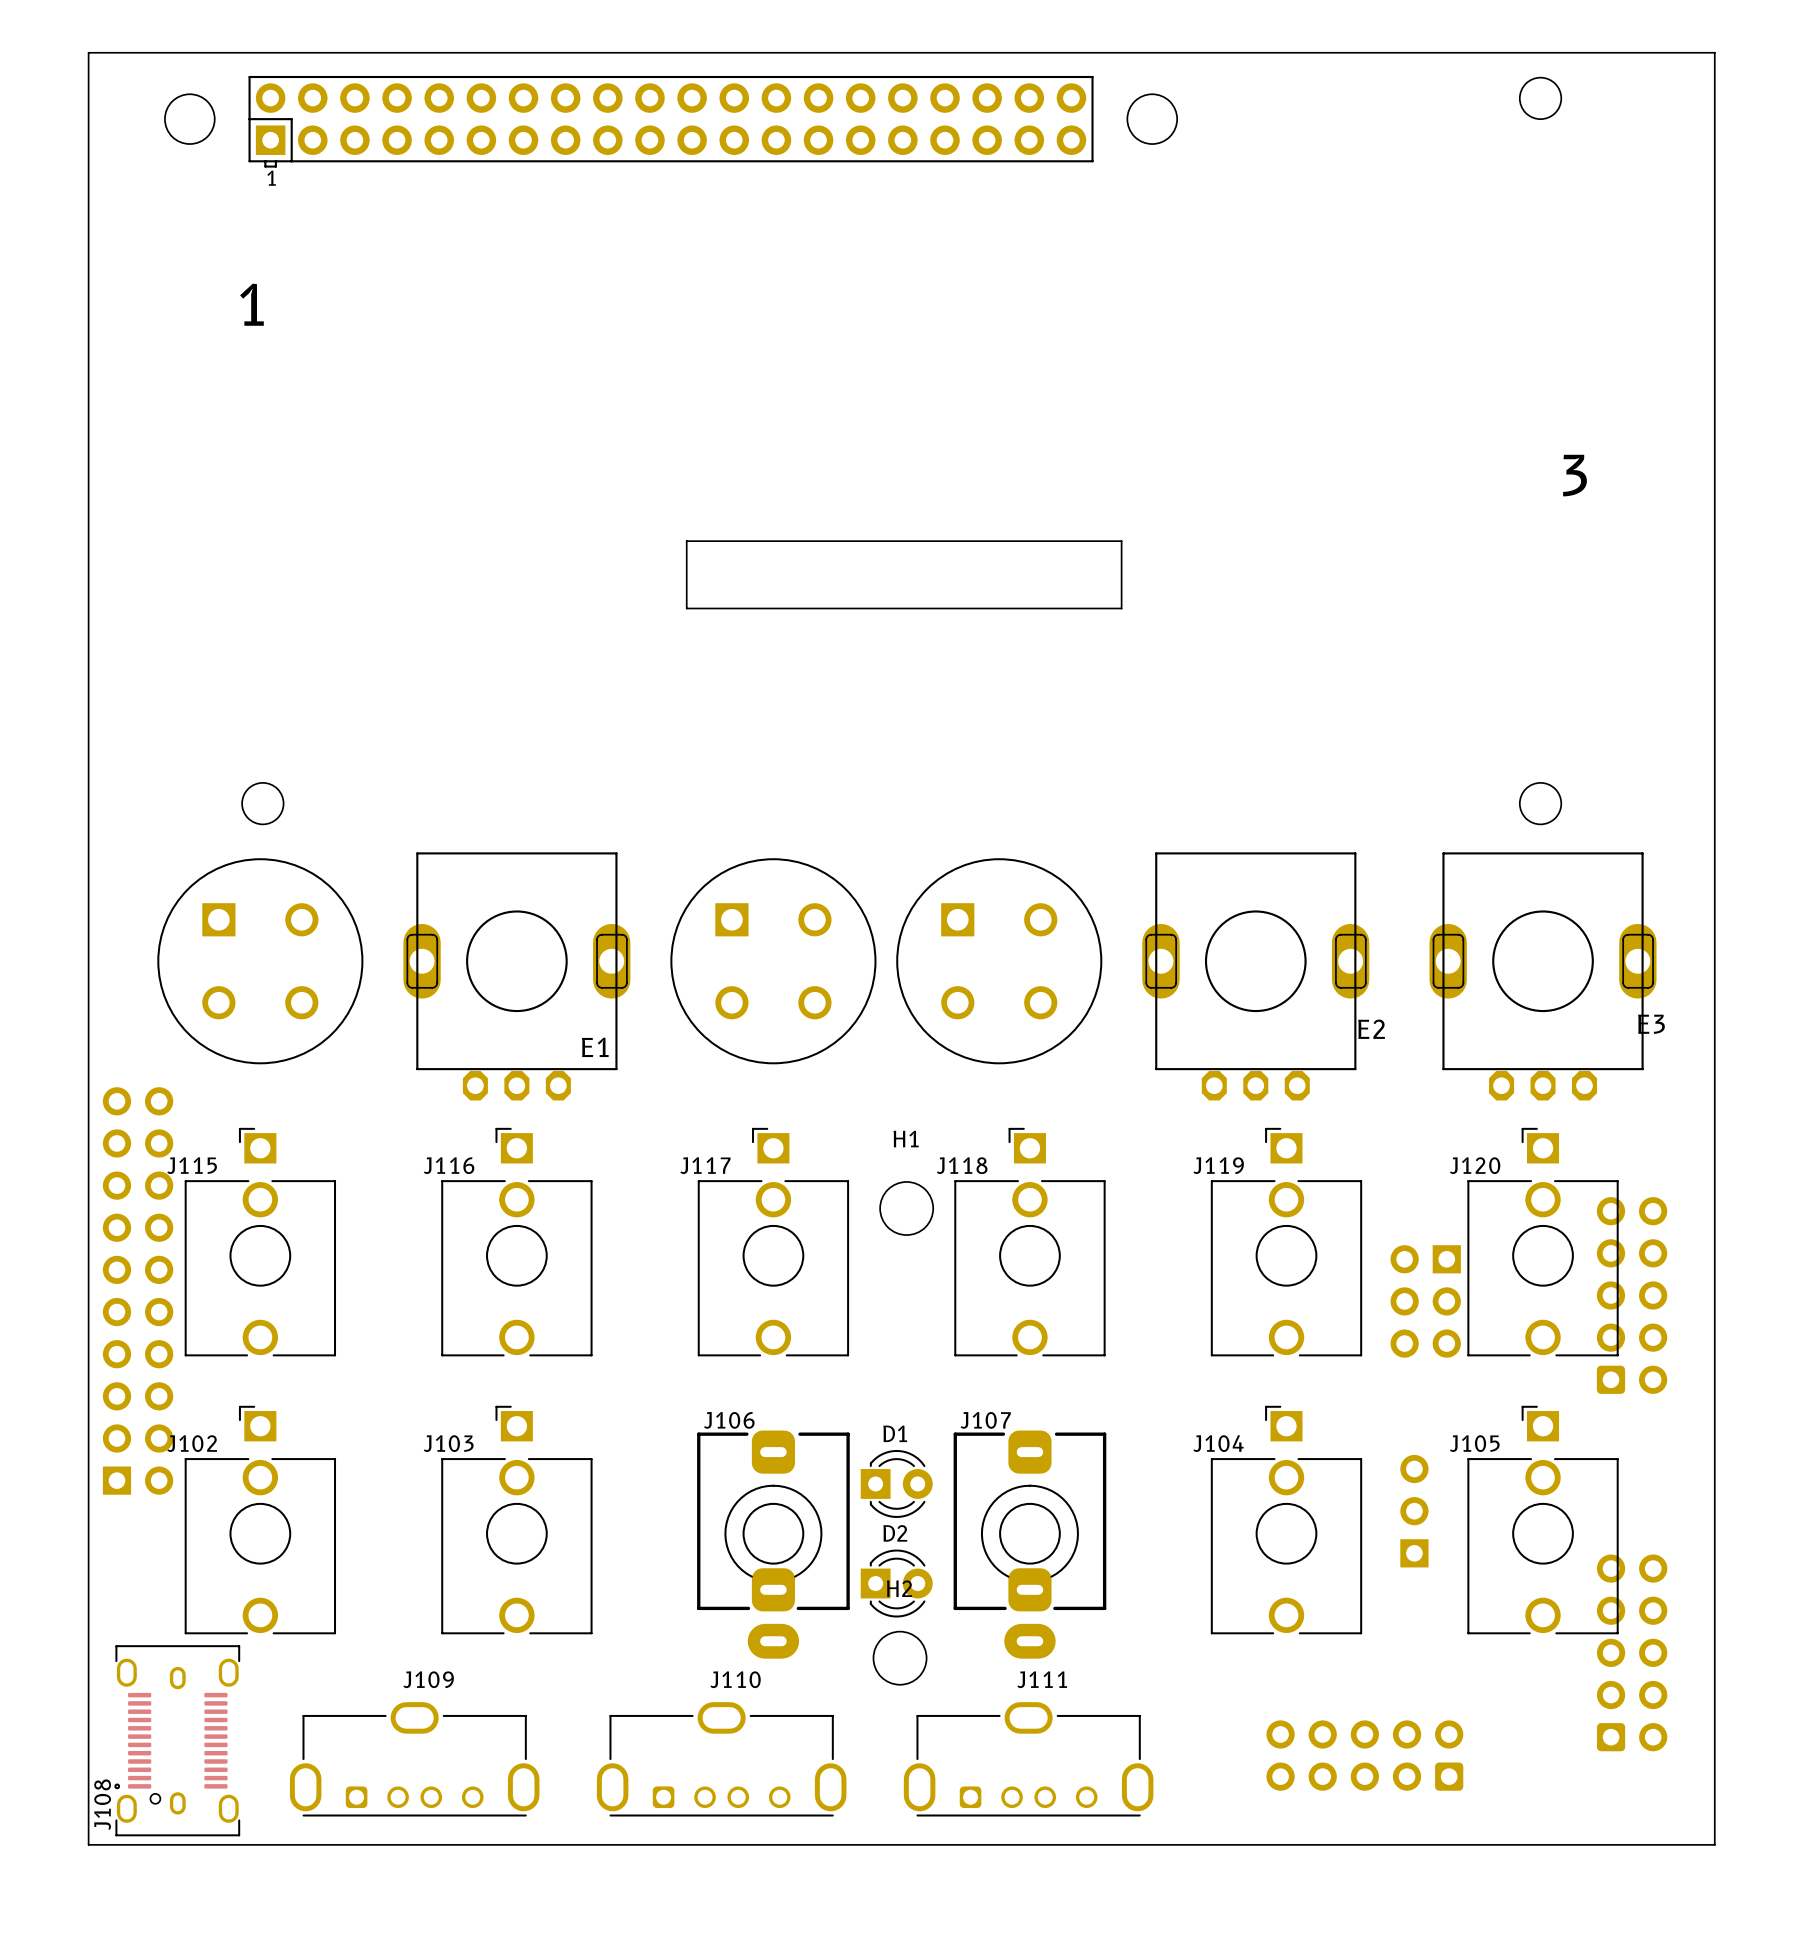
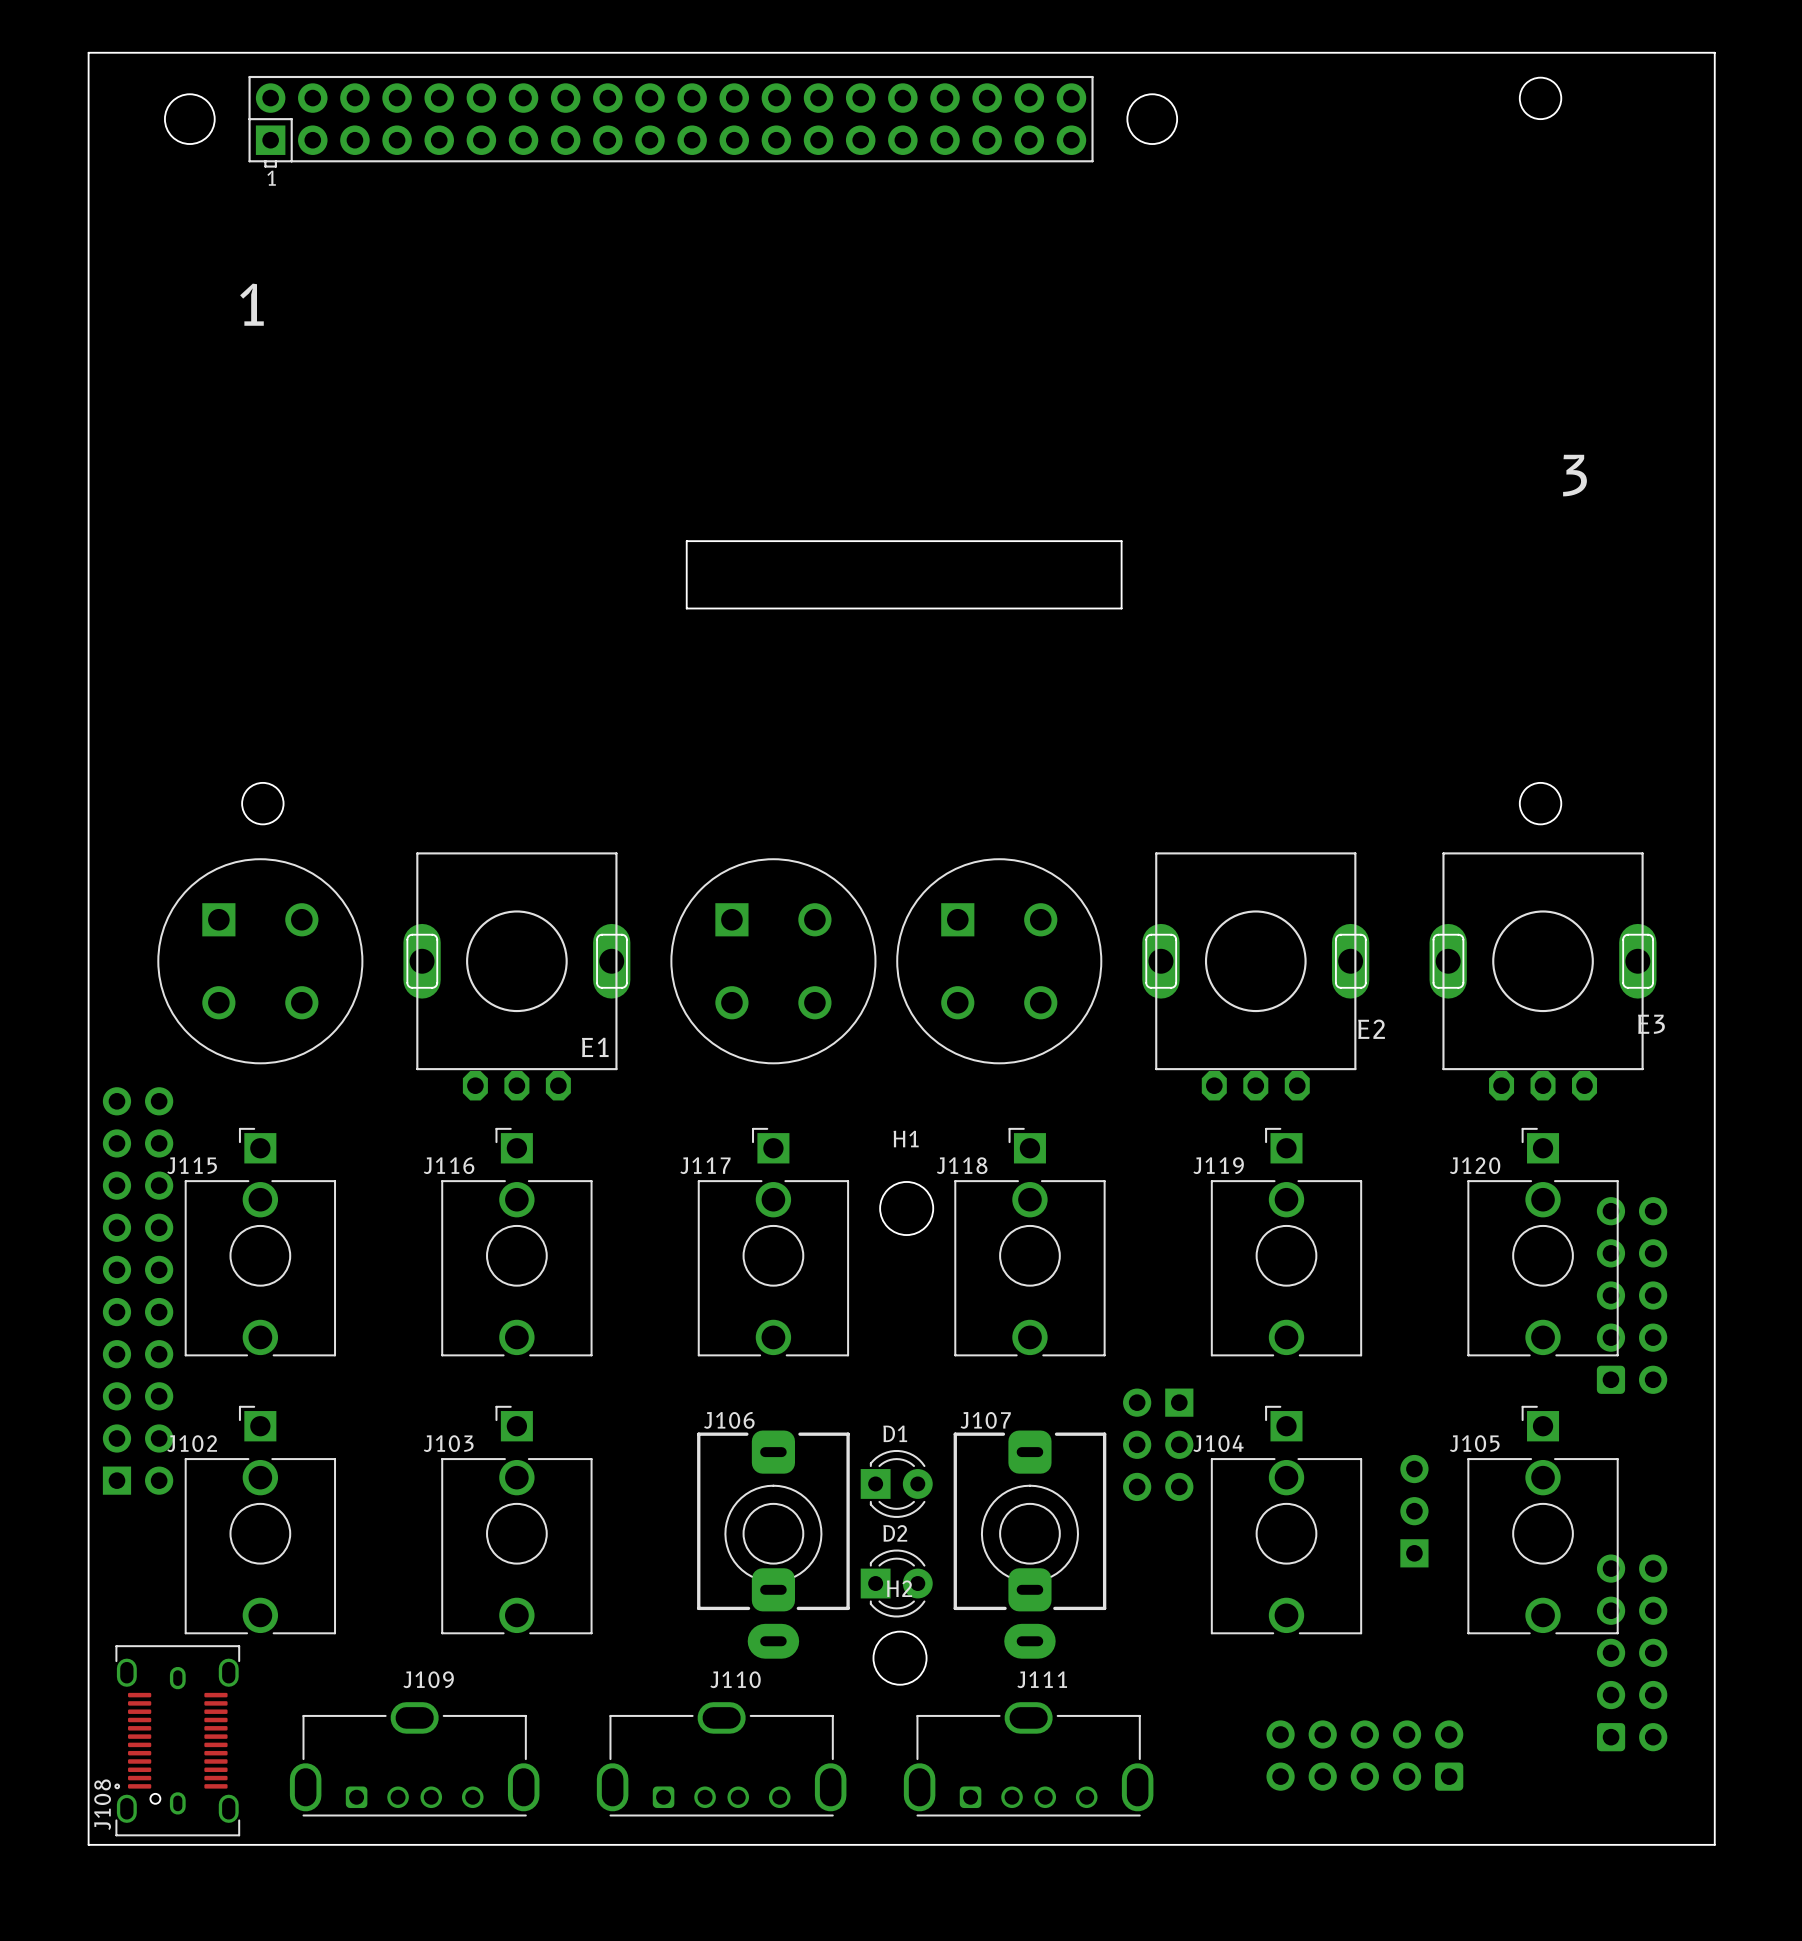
part position: (1425, 1301) -> (1158, 1444)

